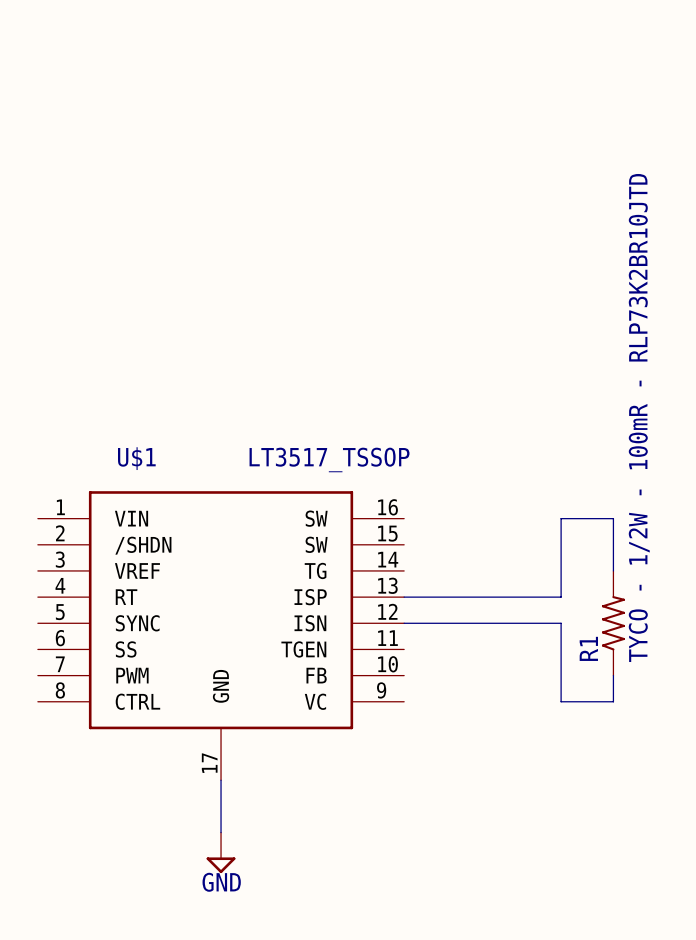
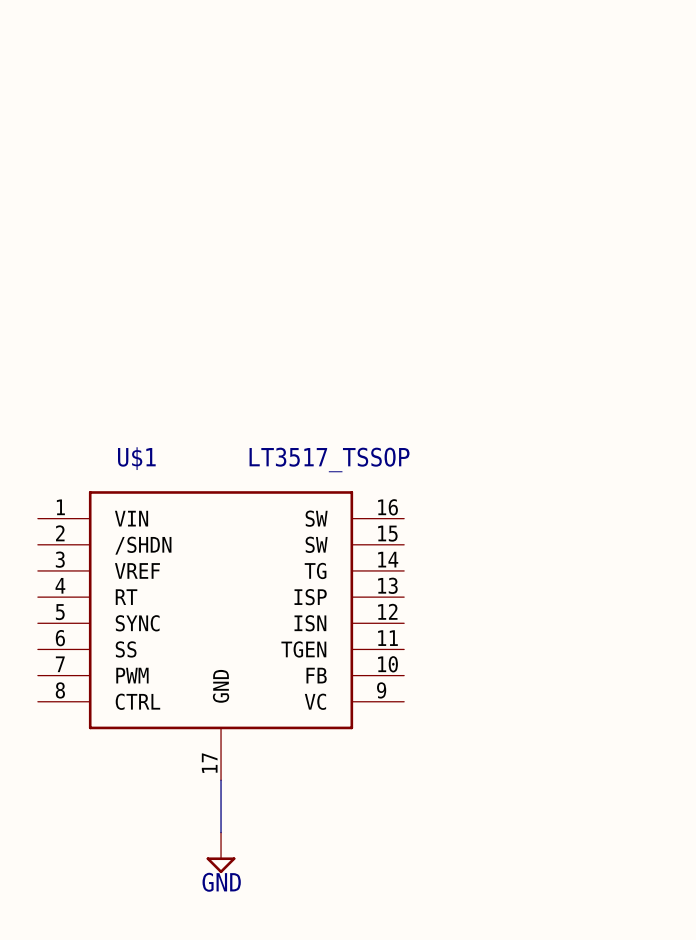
wire: (613, 570) (613, 518) (561, 518) (561, 597) (404, 597) -> none
wire: (404, 623) (561, 623) (561, 701) (613, 701) (613, 675) -> none
R1: TYCO - 1/2W - 100mR - RLP73K2BR10JTD (613, 623) -> none

